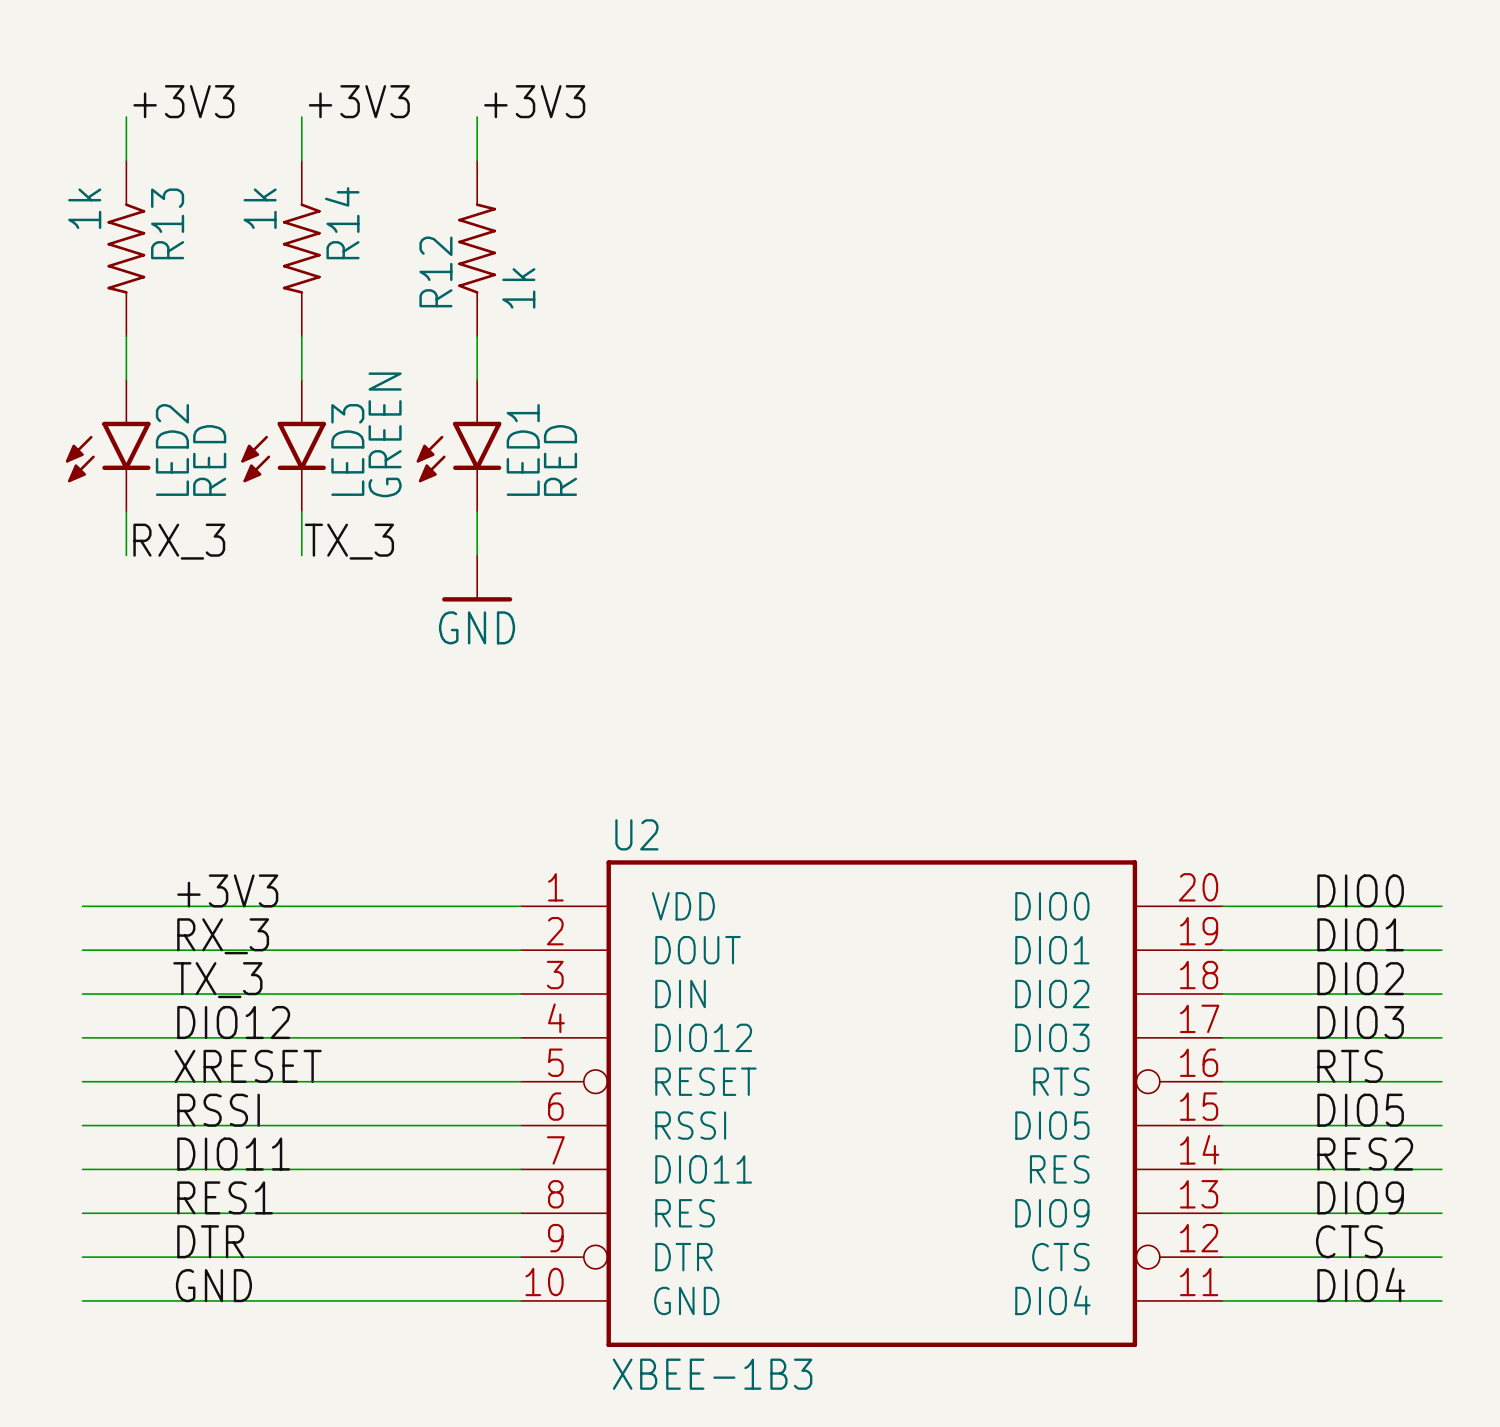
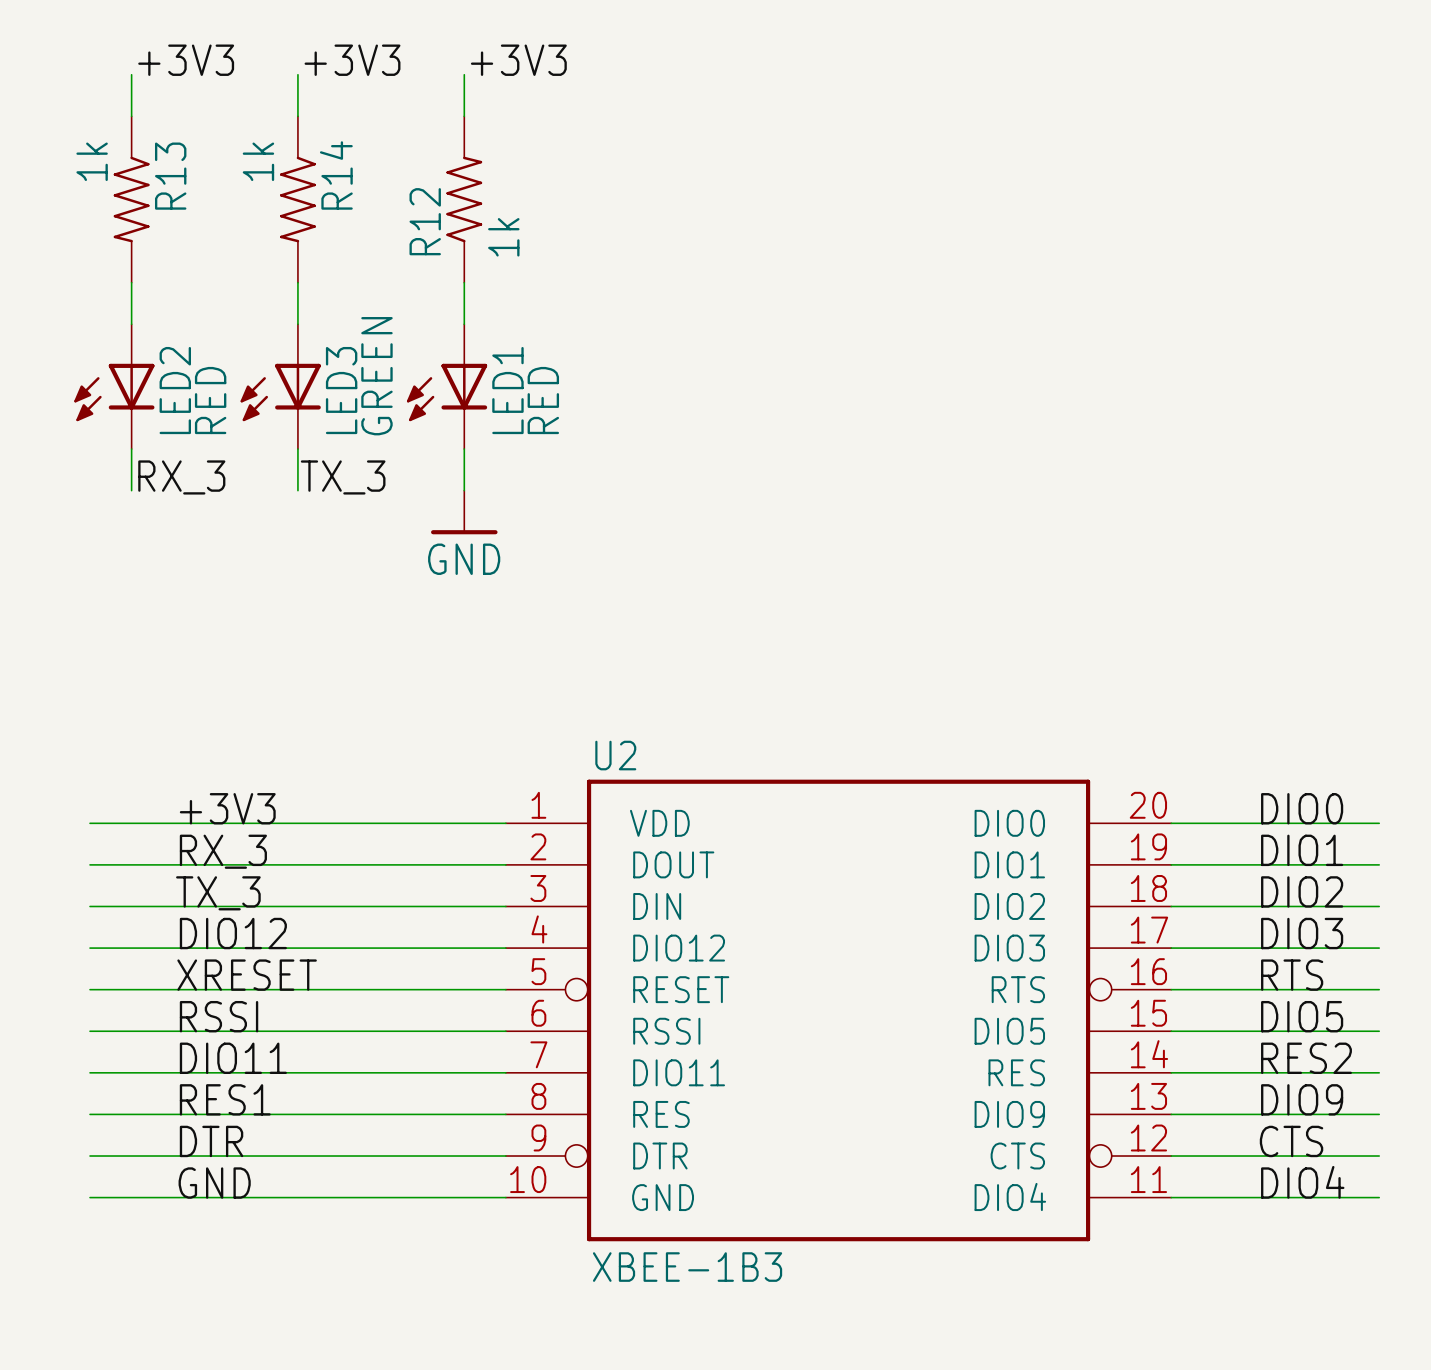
LED2 symbol: [65, 380, 151, 512] -> [74, 324, 155, 450]
LED3 symbol: [241, 380, 326, 512] -> [240, 324, 321, 450]
LED1 symbol: [416, 380, 502, 512] -> [406, 324, 488, 450]

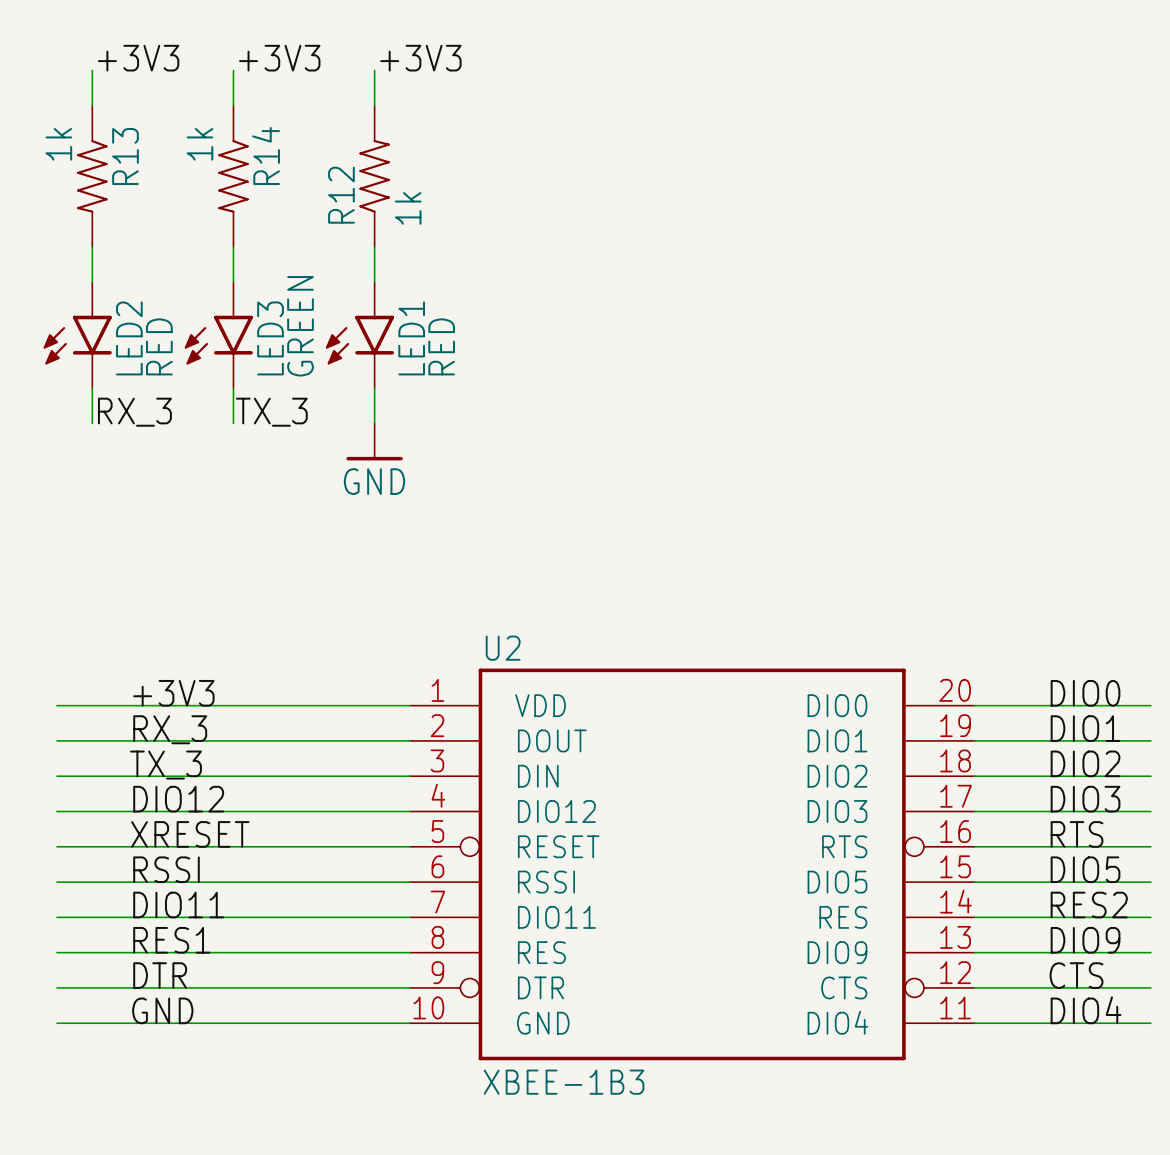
LED2 symbol: [74, 324, 155, 450] -> [43, 282, 112, 389]
LED3 symbol: [240, 324, 321, 450] -> [184, 282, 253, 389]
LED1 symbol: [406, 324, 488, 450] -> [325, 282, 395, 389]

